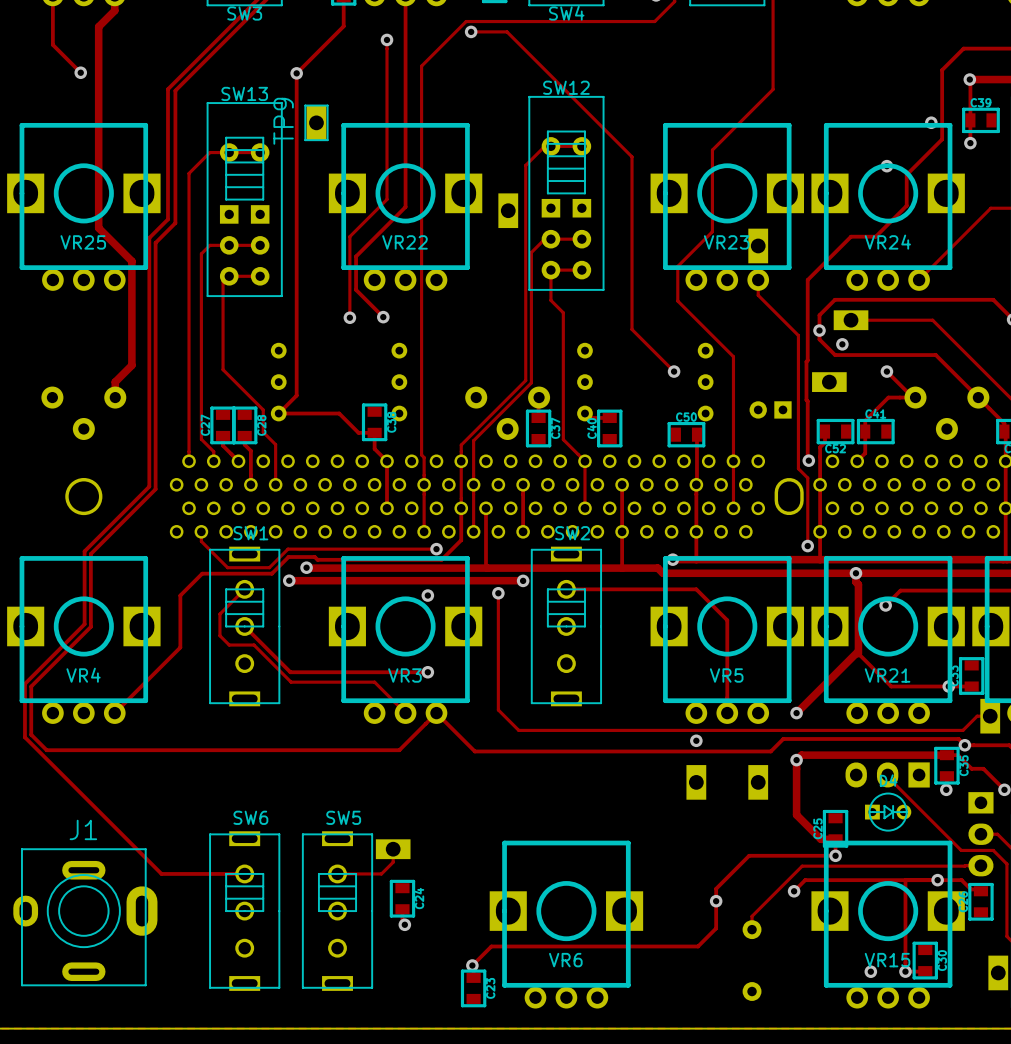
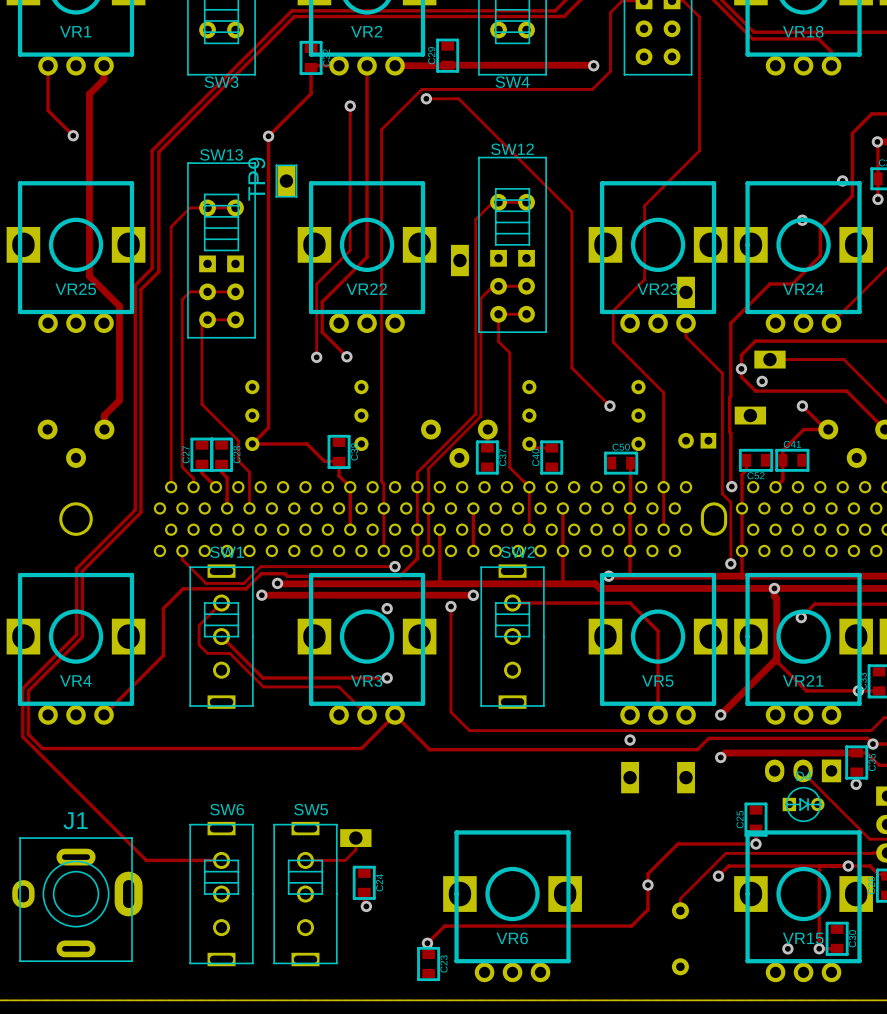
track: (796, 760) (796, 814) (820, 839) (835, 839) -> none

